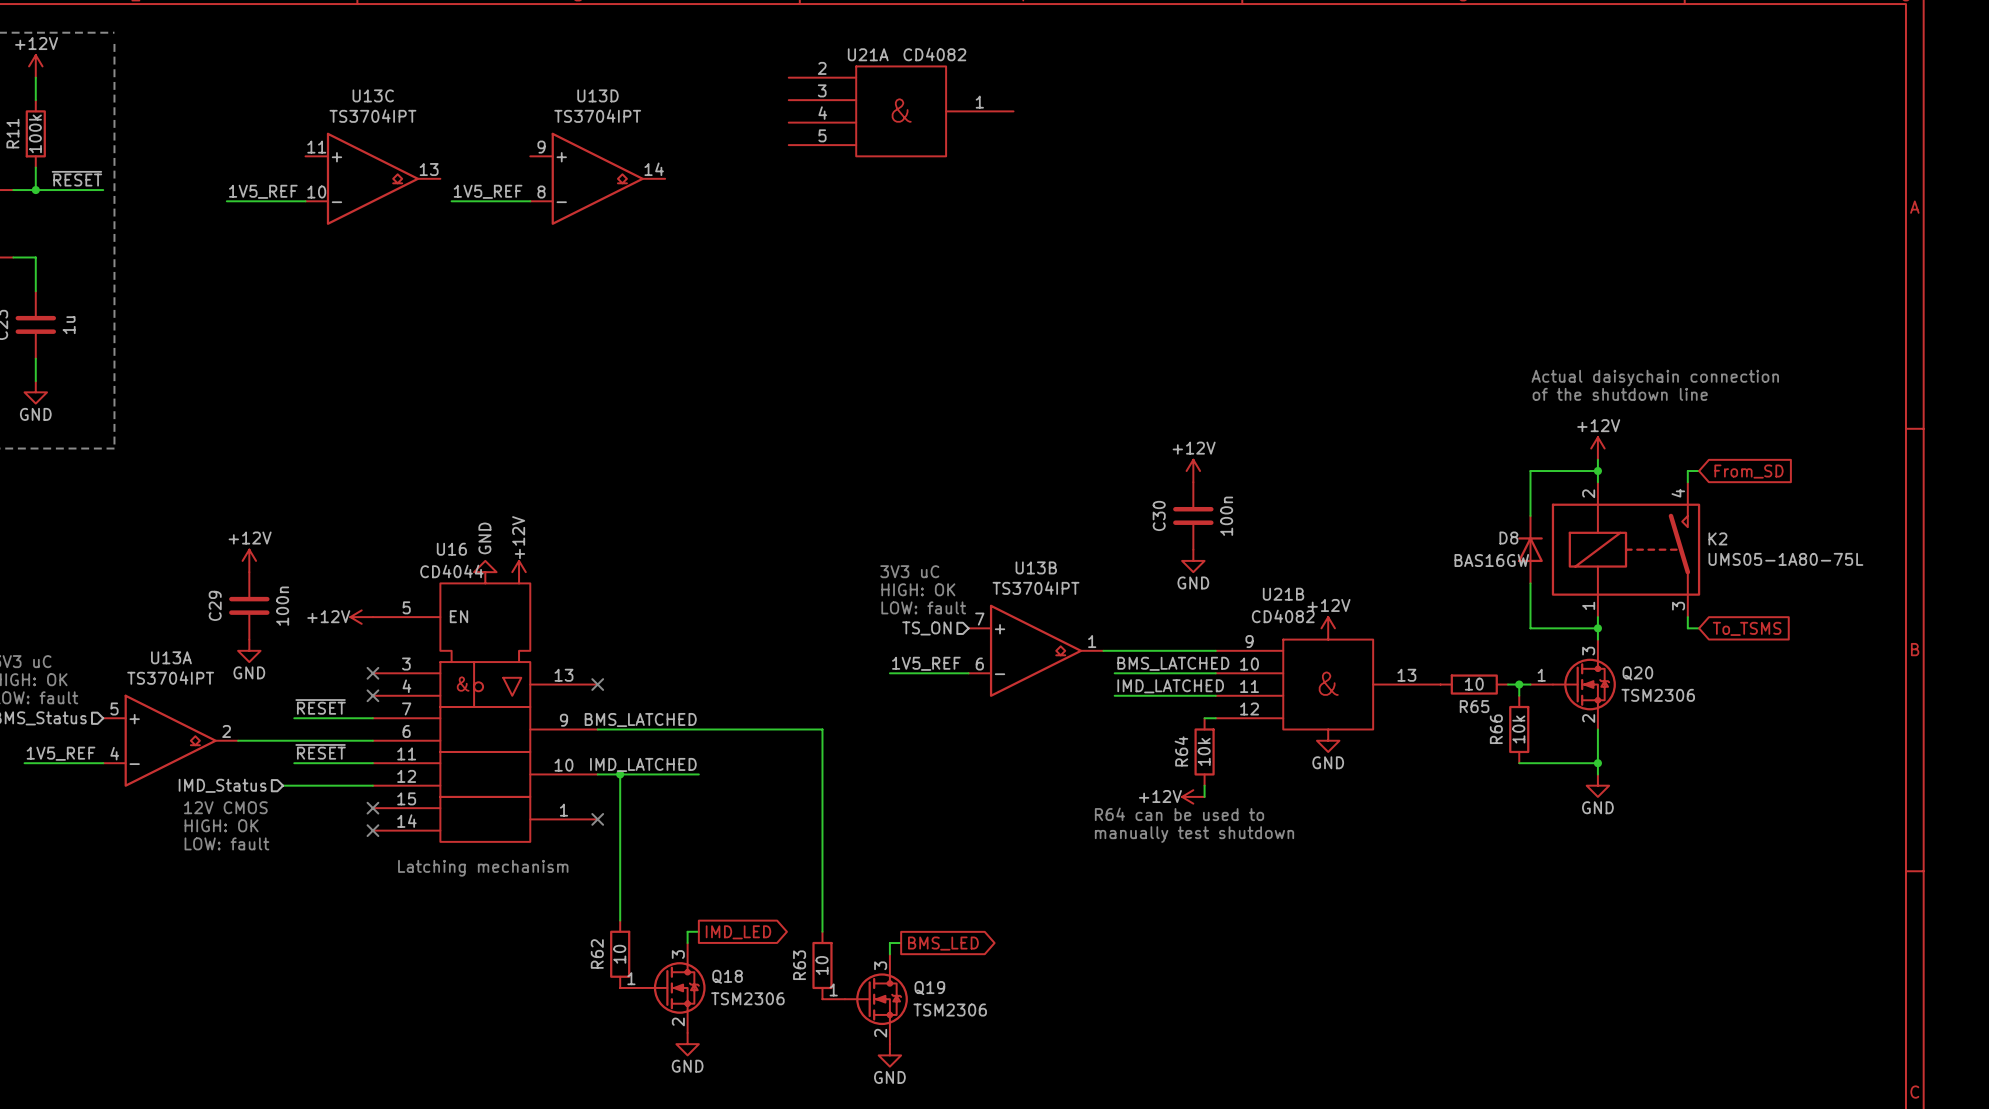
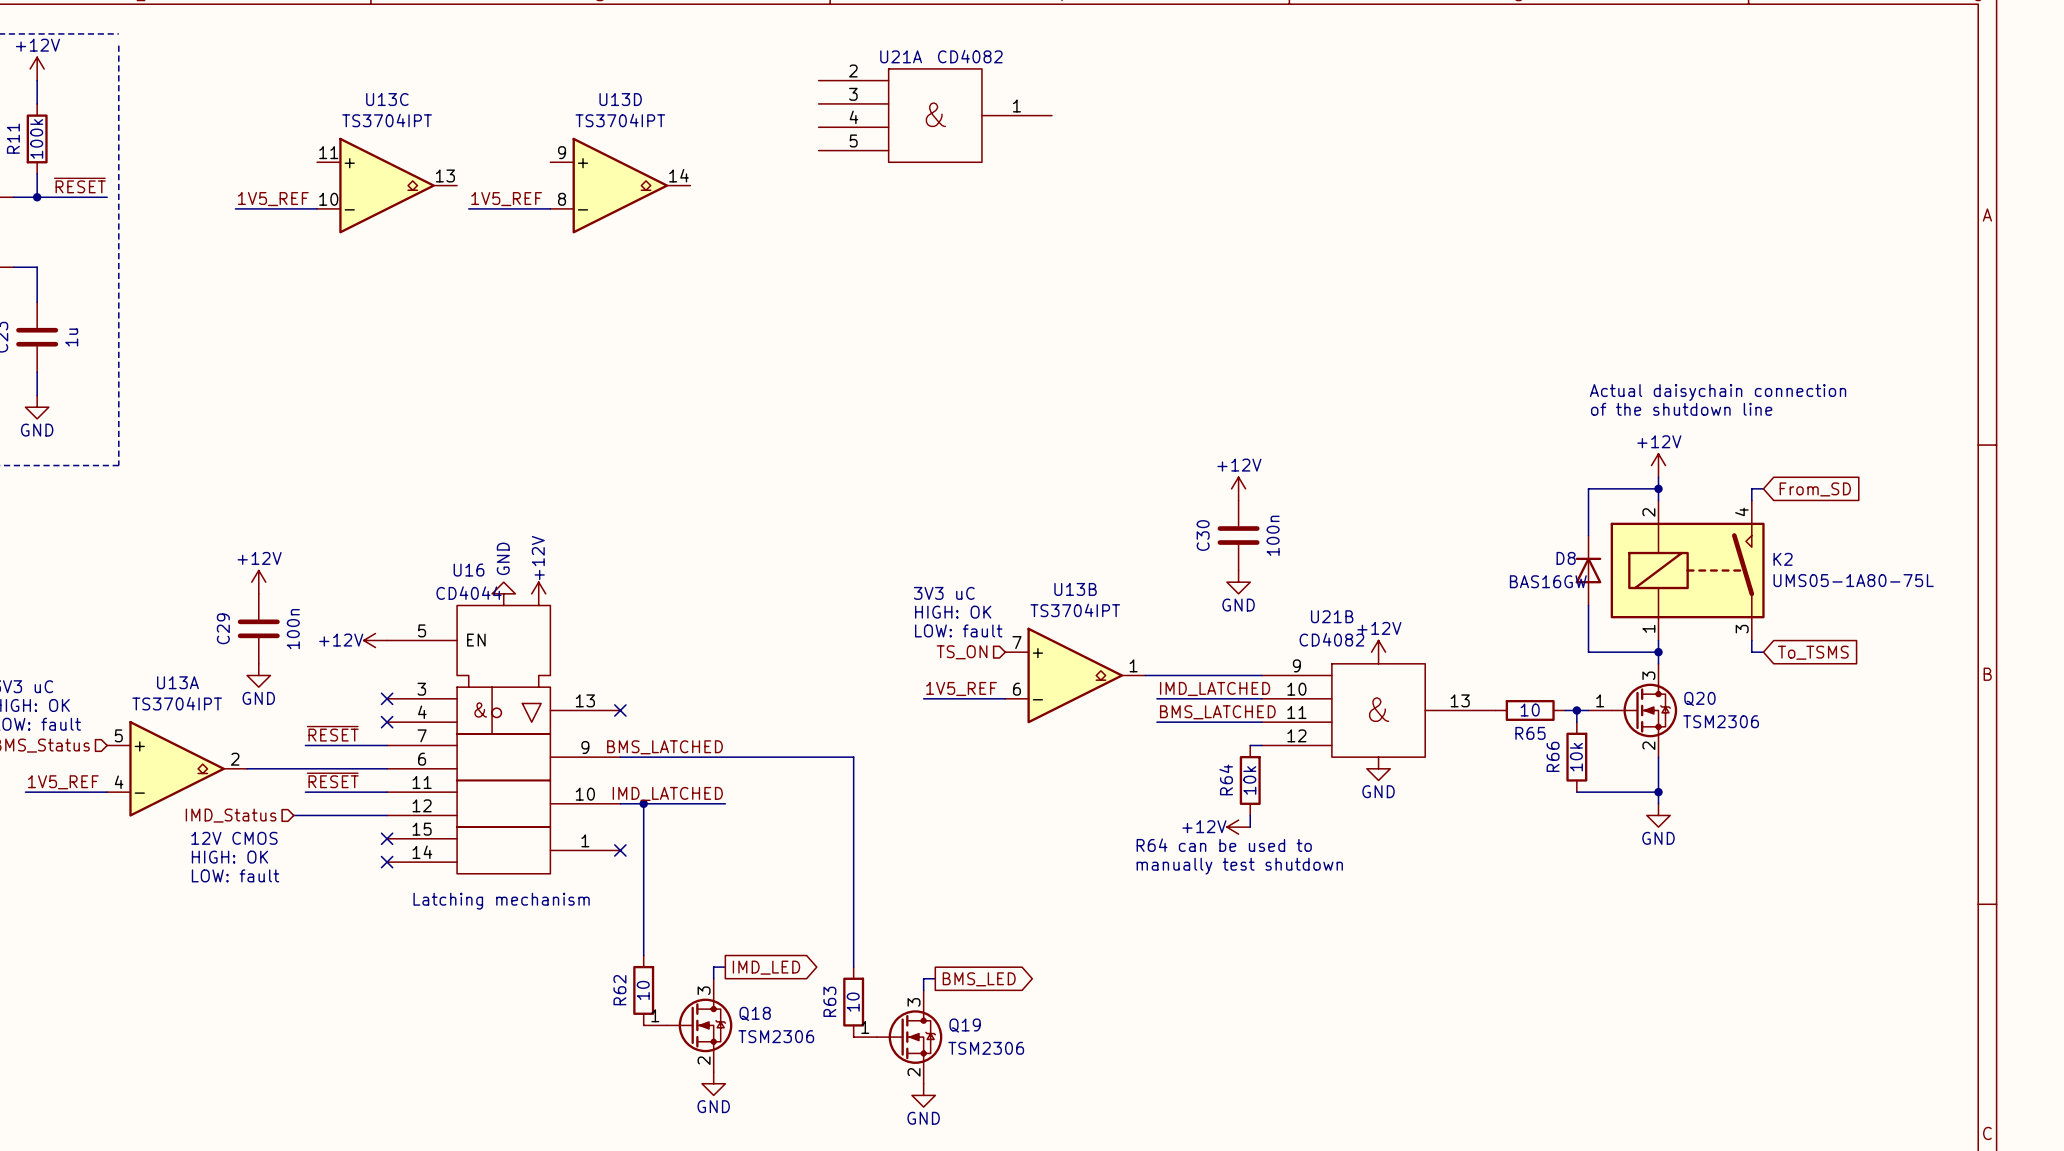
label: BMS_LATCHED (1173, 663) -> IMD_LATCHED (1215, 688)
label: IMD_LATCHED (1170, 686) -> BMS_LATCHED (1217, 712)

